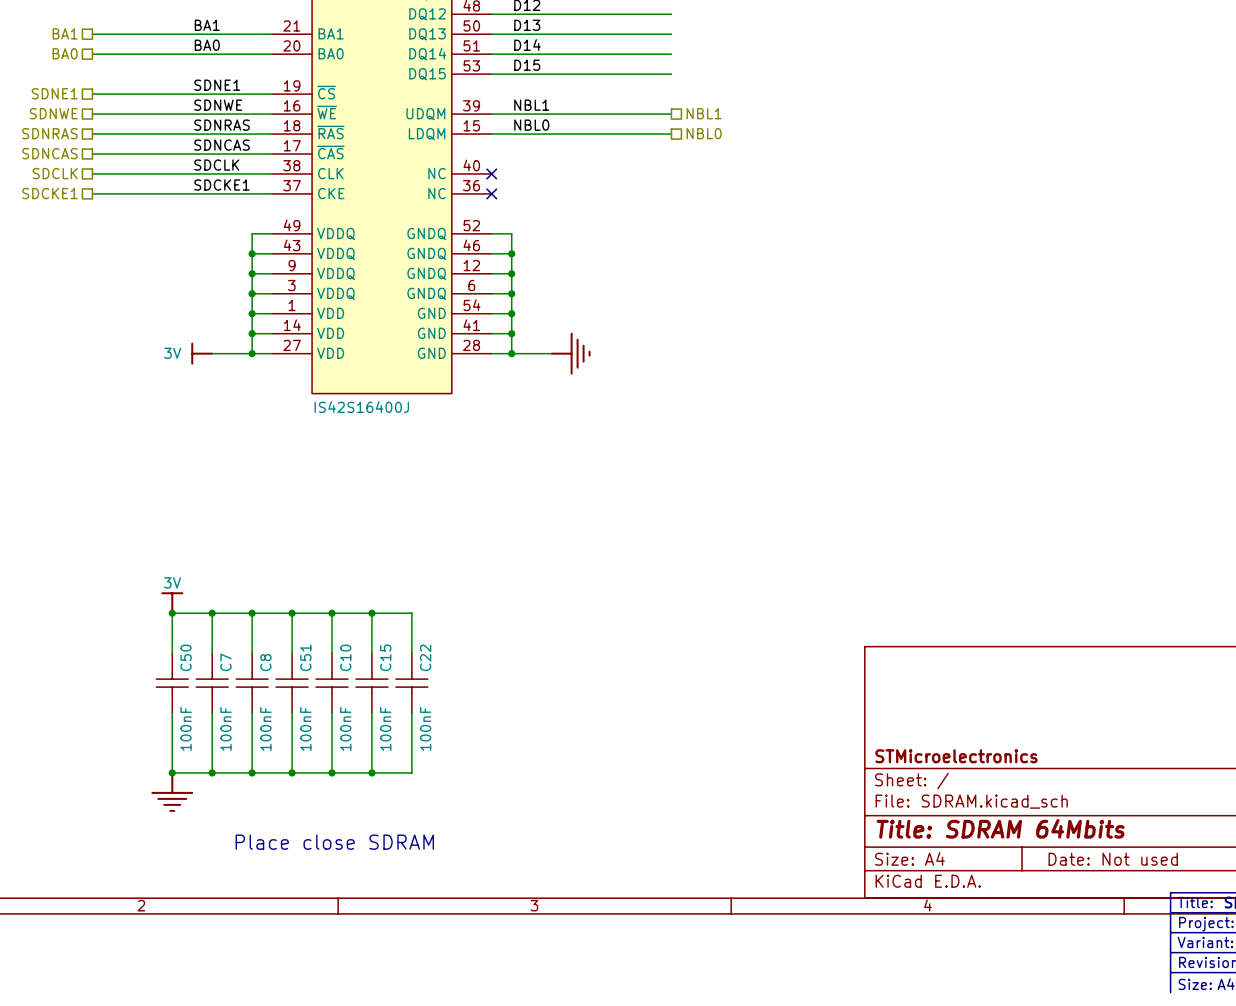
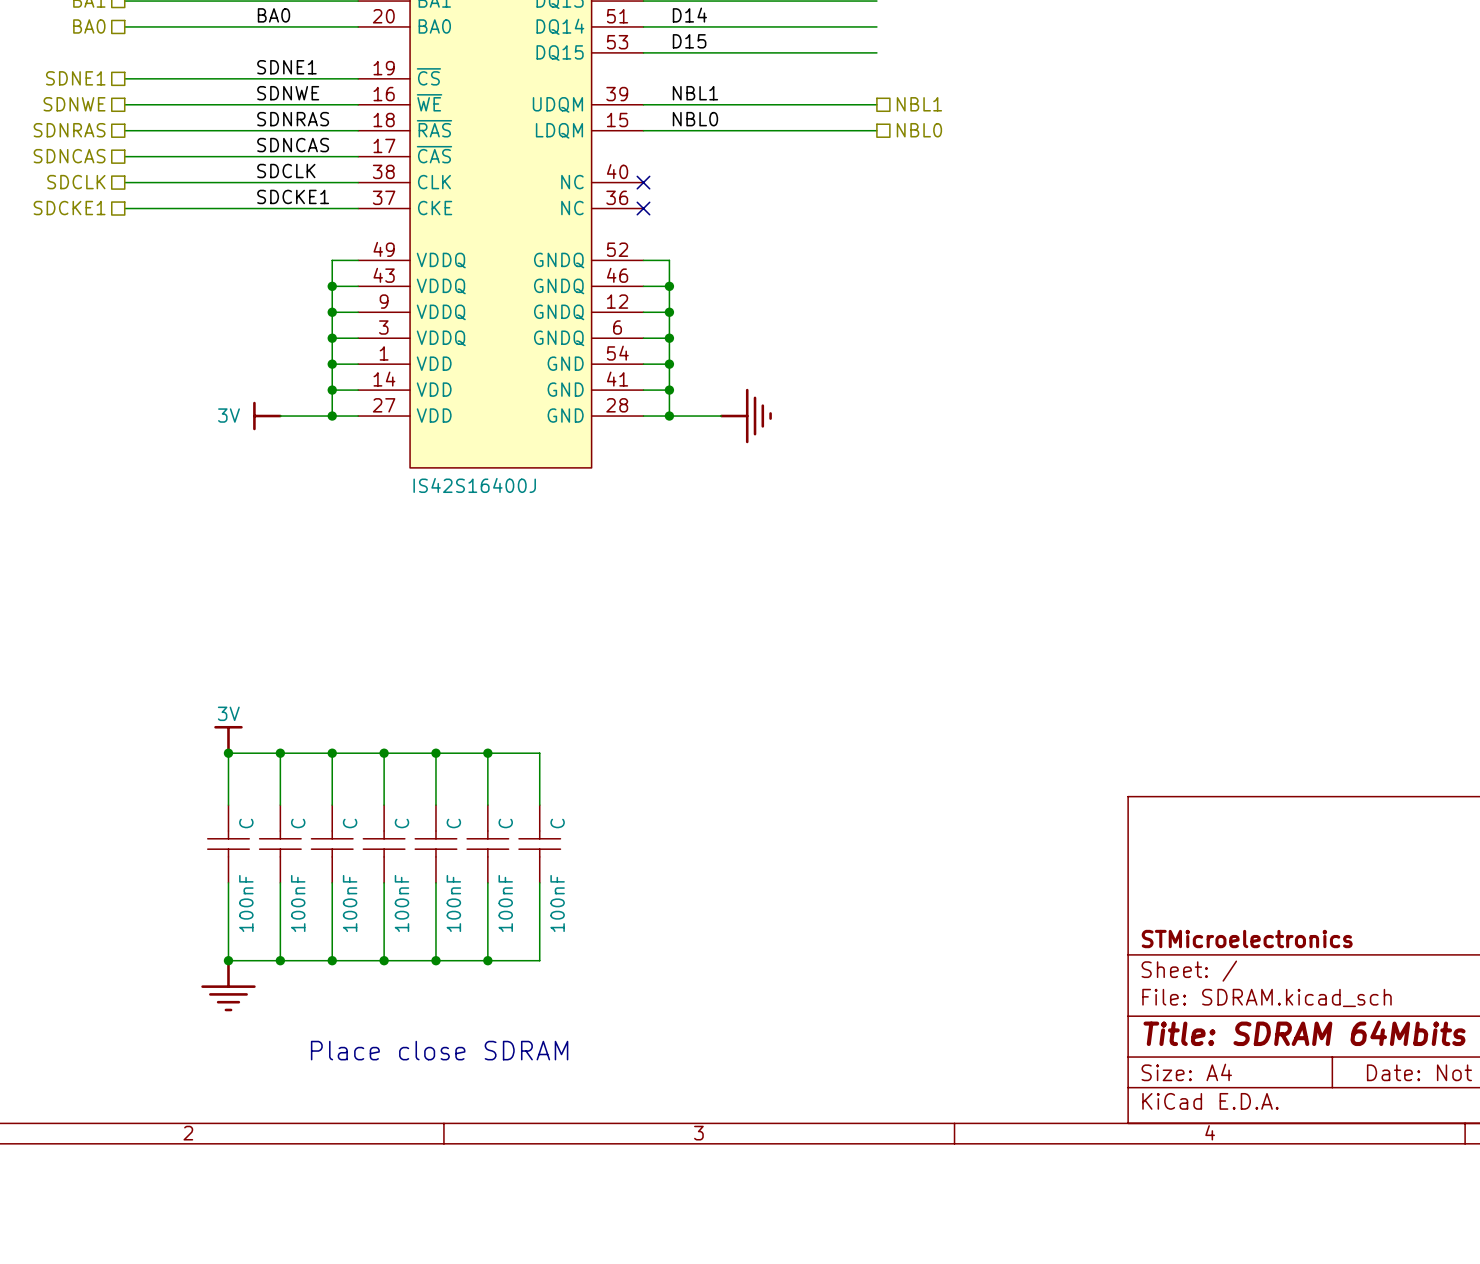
C50 name: C50 (186, 657) -> C (246, 823)
C51 name: C51 (305, 657) -> C (401, 823)
C10 name: C10 (345, 657) -> C (453, 823)
C15 name: C15 (385, 657) -> C (505, 823)
C22 name: C22 (425, 657) -> C (557, 823)
C7 name: C7 (225, 662) -> C (298, 823)
C8 name: C8 (265, 662) -> C (350, 823)

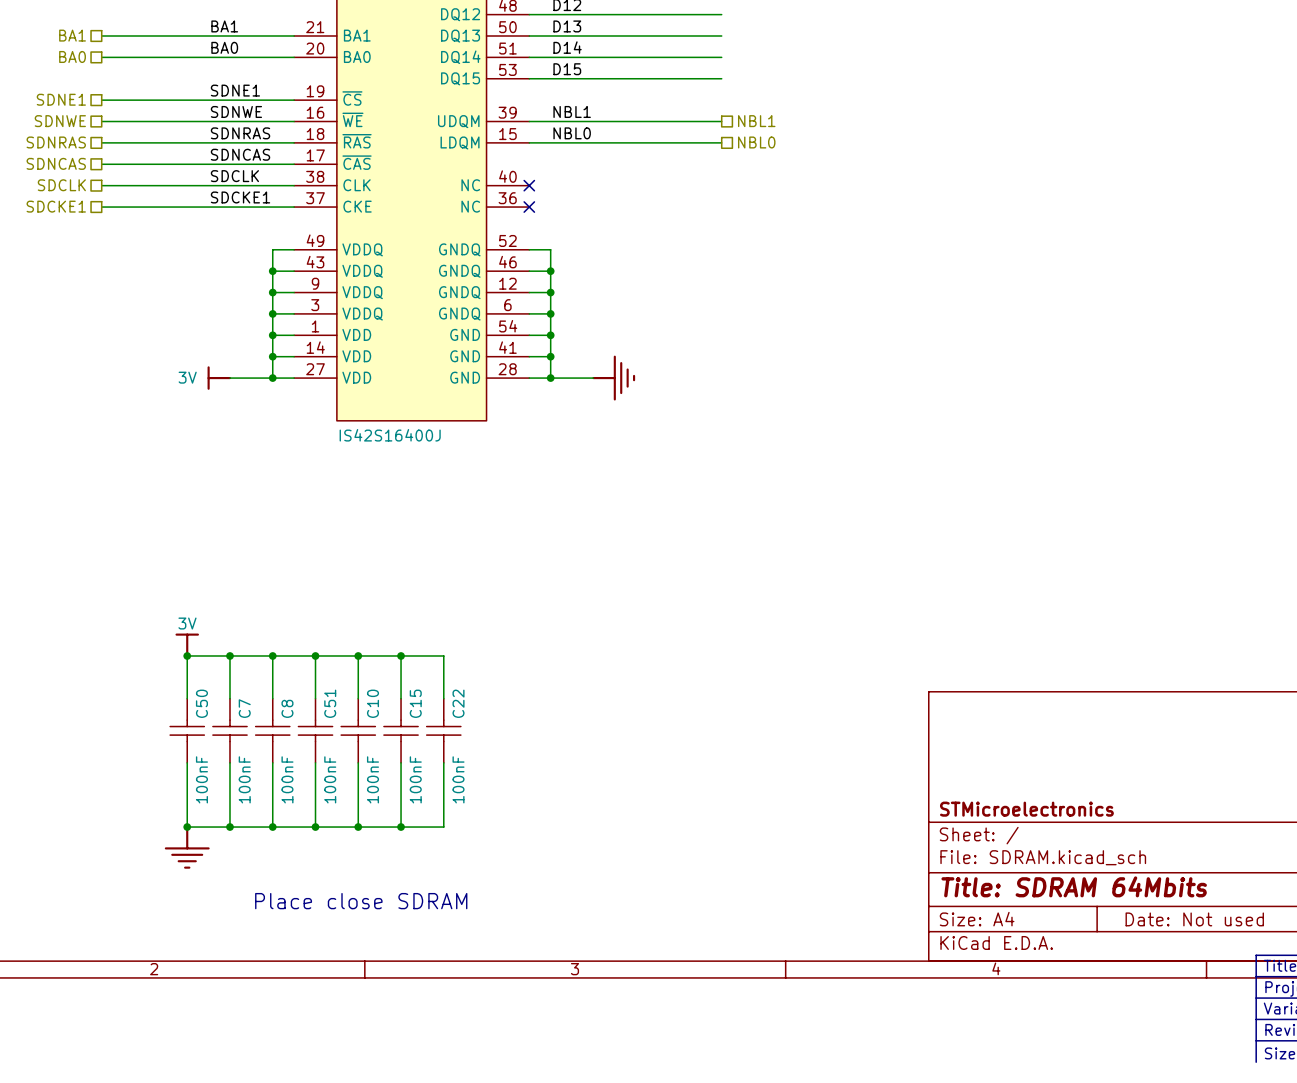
C name: C (246, 823) -> C50 (201, 703)
C name: C (298, 823) -> C7 (244, 708)
C name: C (350, 823) -> C8 (287, 708)
C name: C (401, 823) -> C51 (330, 703)
C name: C (453, 823) -> C10 (372, 703)
C name: C (505, 823) -> C15 (415, 703)
C name: C (557, 823) -> C22 (458, 703)

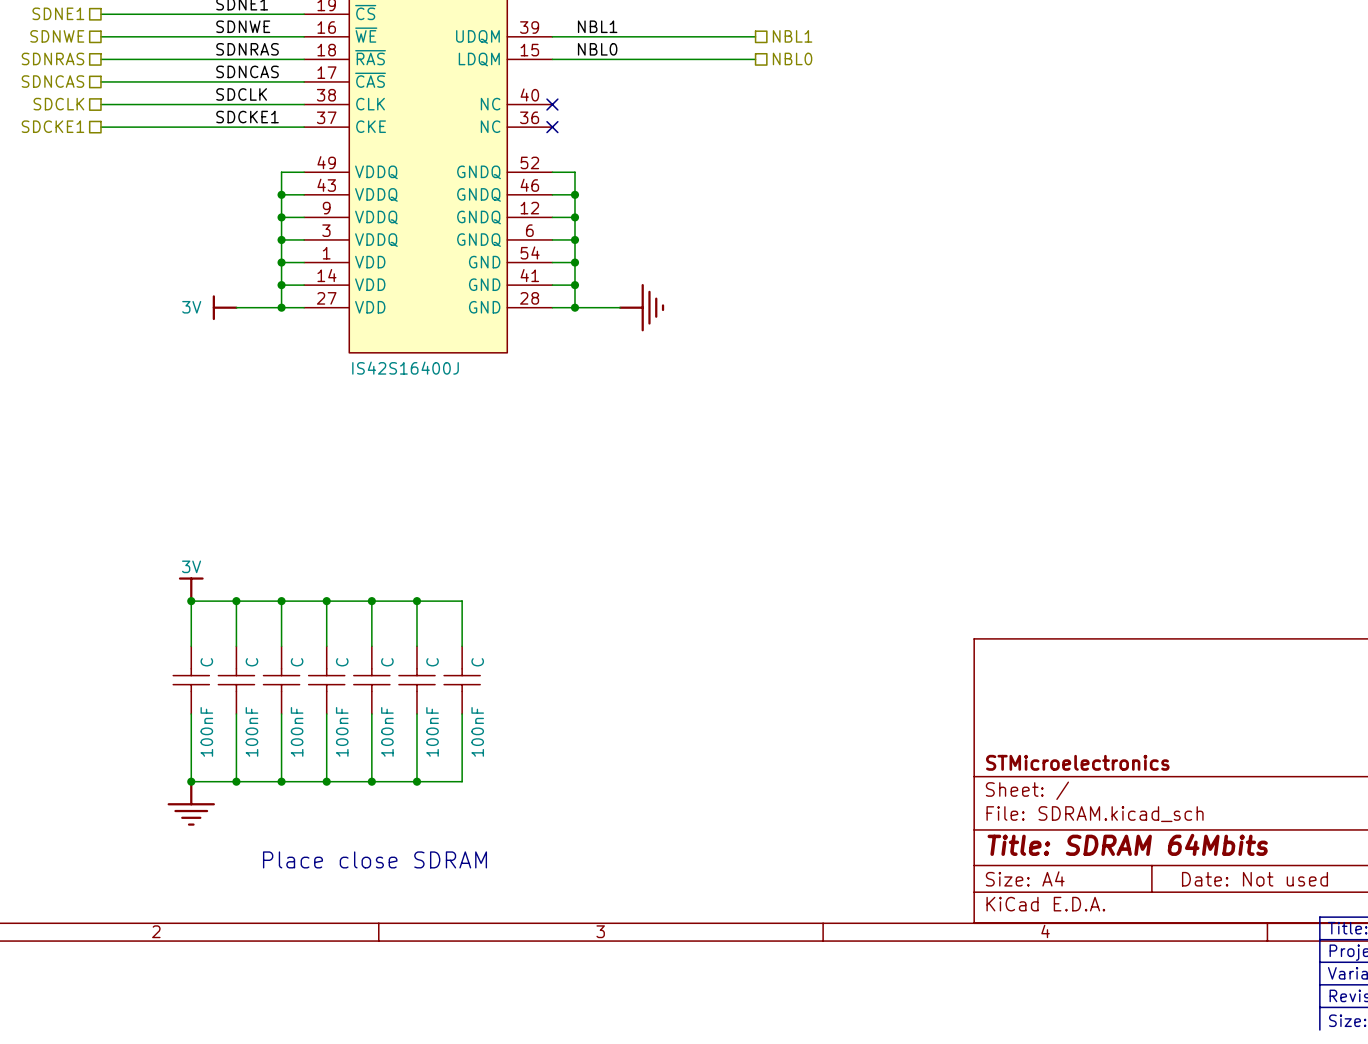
C50 name: C50 (201, 703) -> C (206, 662)
C51 name: C51 (330, 703) -> C (342, 662)
C10 name: C10 (372, 703) -> C (387, 662)
C15 name: C15 (415, 703) -> C (432, 662)
C22 name: C22 (458, 703) -> C (477, 662)
C7 name: C7 (244, 708) -> C (251, 662)
C8 name: C8 (287, 708) -> C (297, 662)

